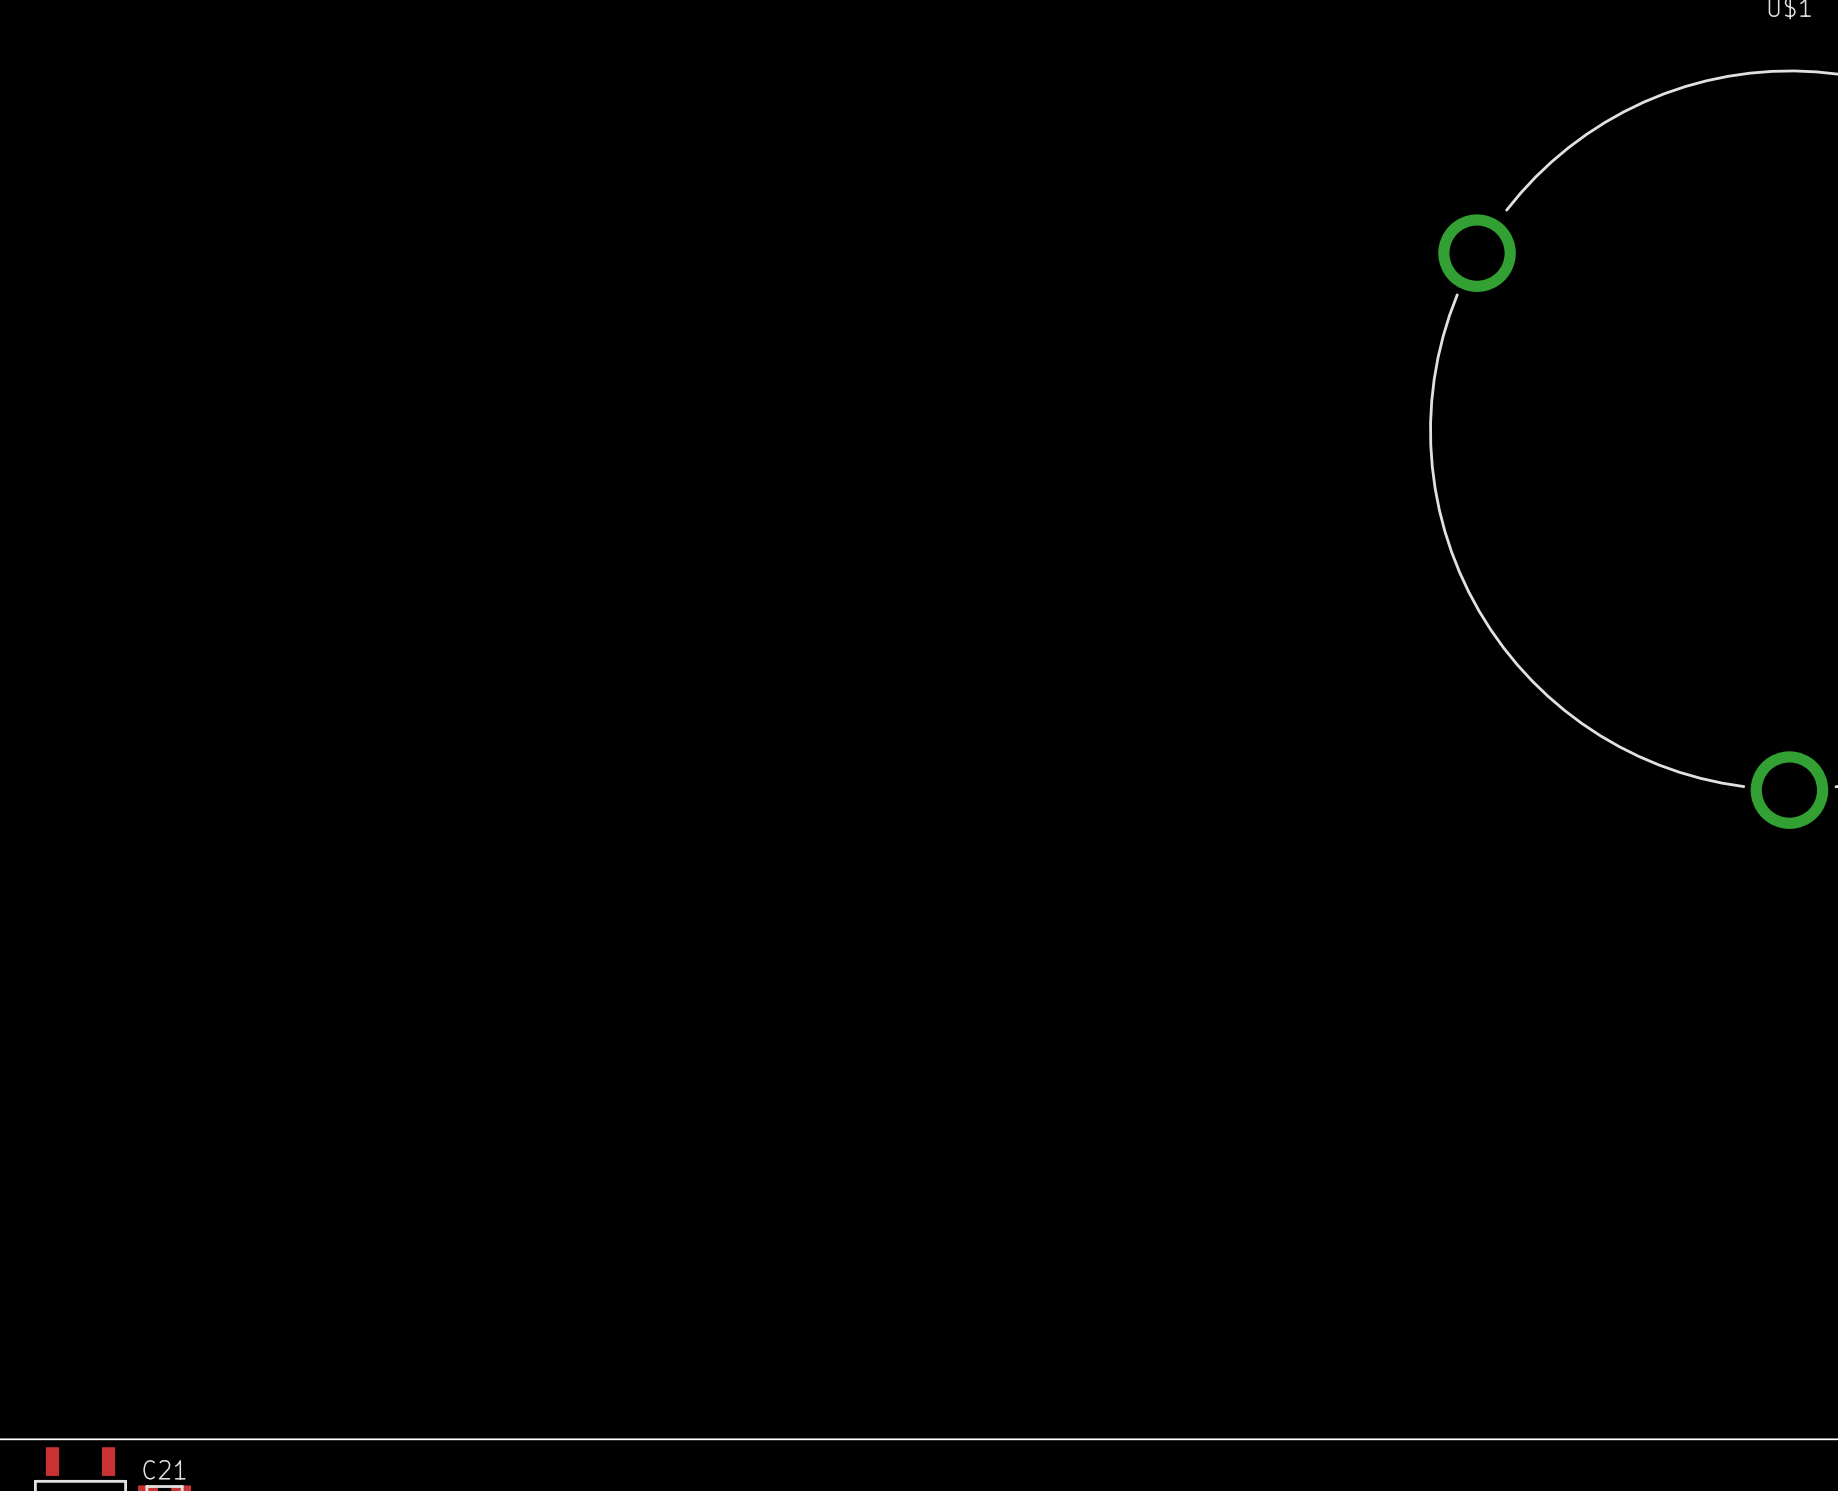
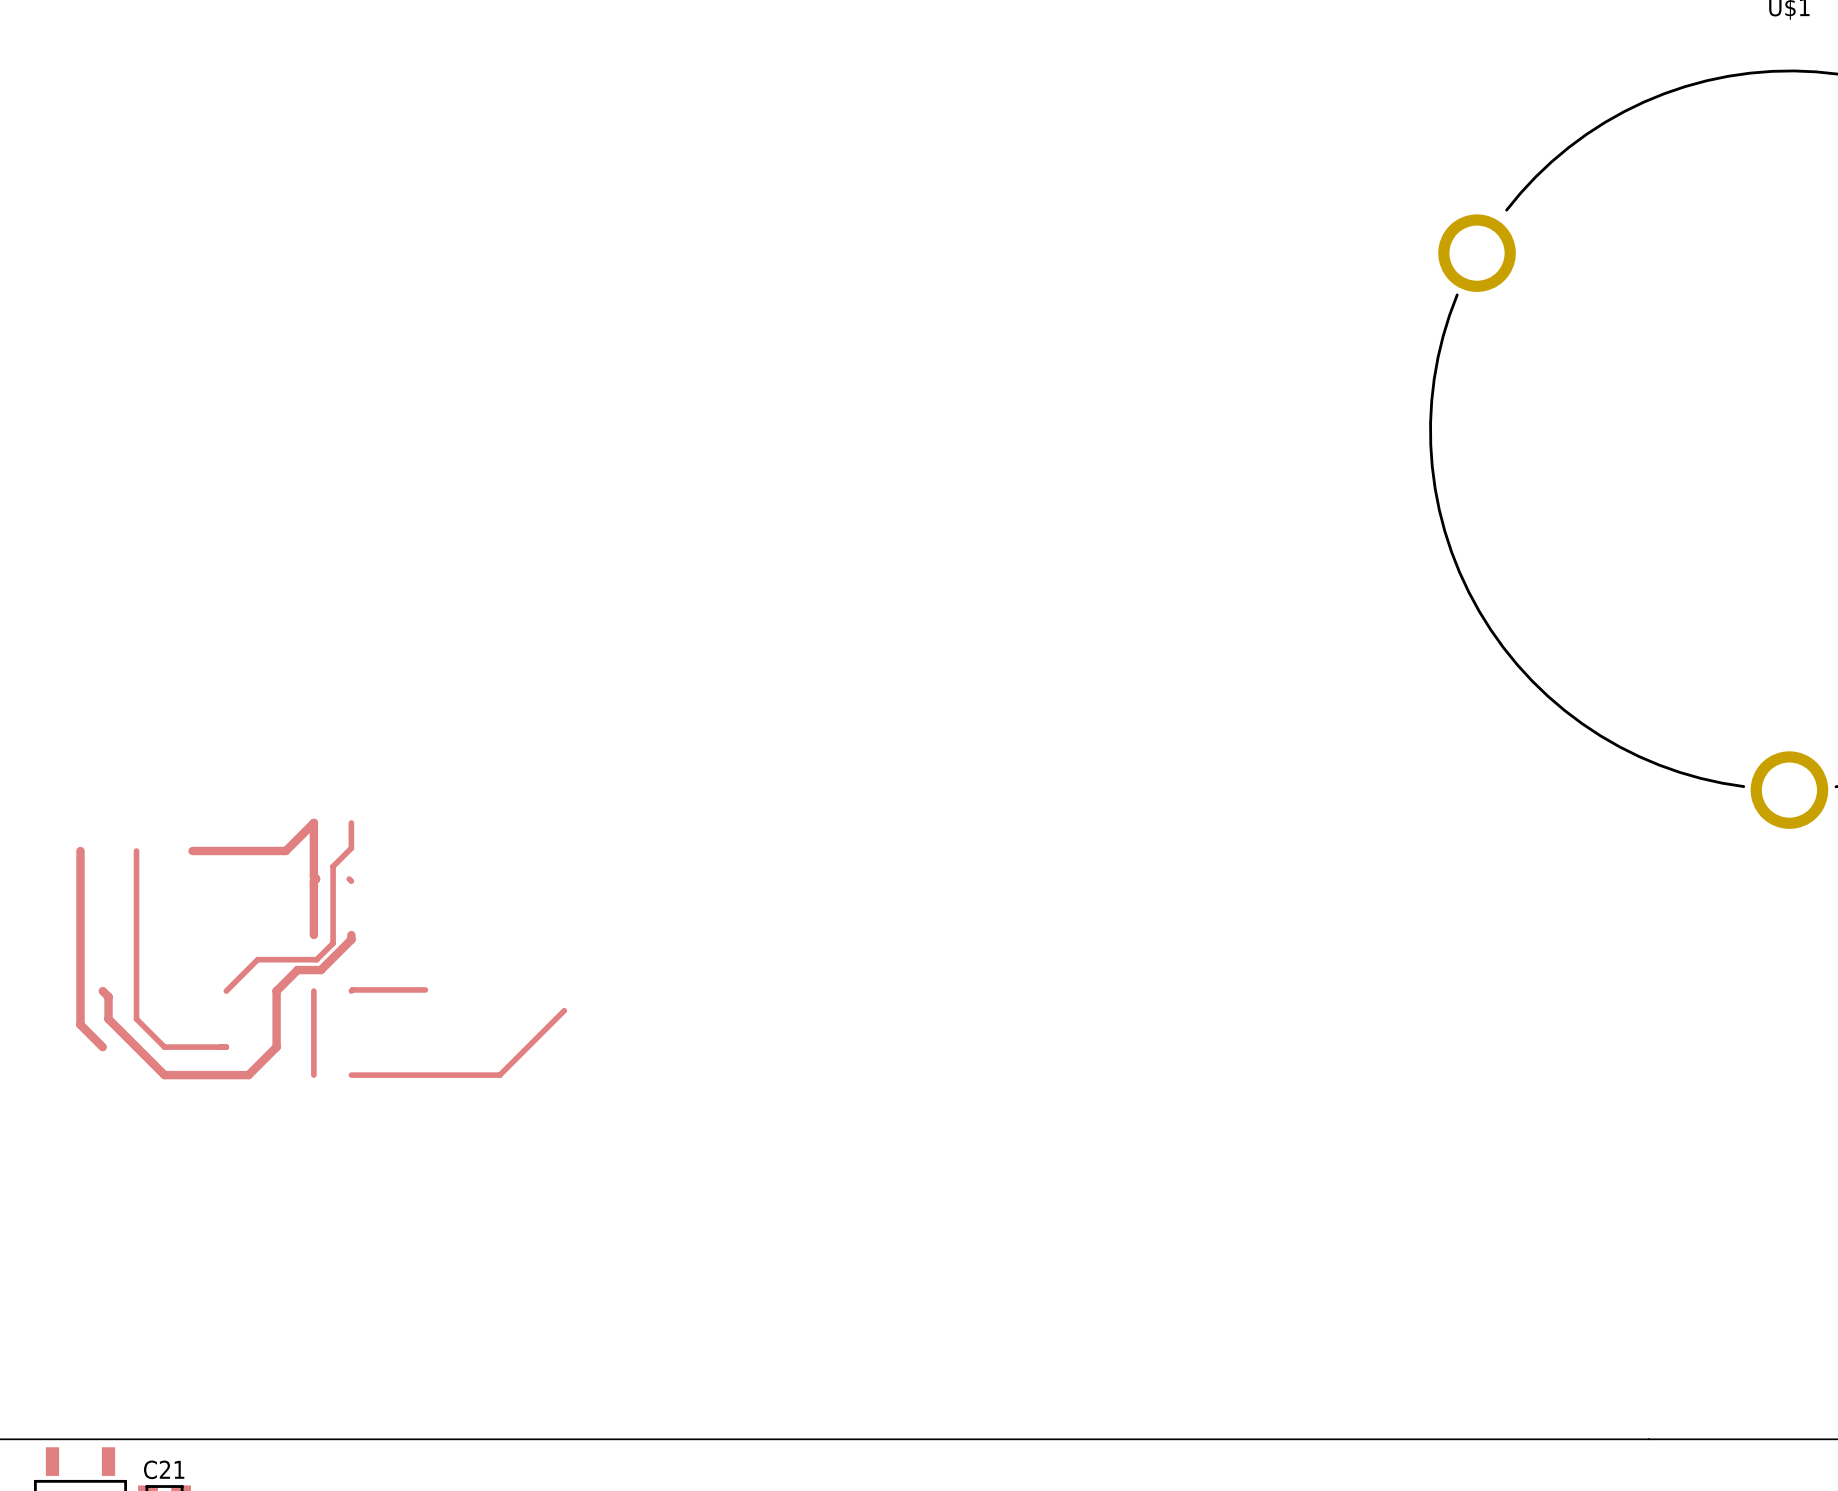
track: none -> (351, 822) (351, 848) (333, 866) (333, 943) (316, 959) (257, 959) (226, 991)
track: none -> (80, 850) (80, 1024) (102, 1047)
track: none -> (136, 850) (136, 1019) (164, 1047) (226, 1047)
track: none -> (192, 850) (285, 850) (313, 822) (313, 876) (316, 879) (313, 881) (313, 935)
track: none -> (349, 879) (351, 881)
track: none -> (351, 935) (351, 939) (320, 970) (297, 970) (276, 991) (276, 1047) (248, 1075) (164, 1075) (108, 1019) (108, 996) (102, 991)
track: none -> (425, 989) (351, 991)
track: none -> (313, 991) (313, 1075)
track: none -> (564, 1010) (499, 1075) (351, 1075)

